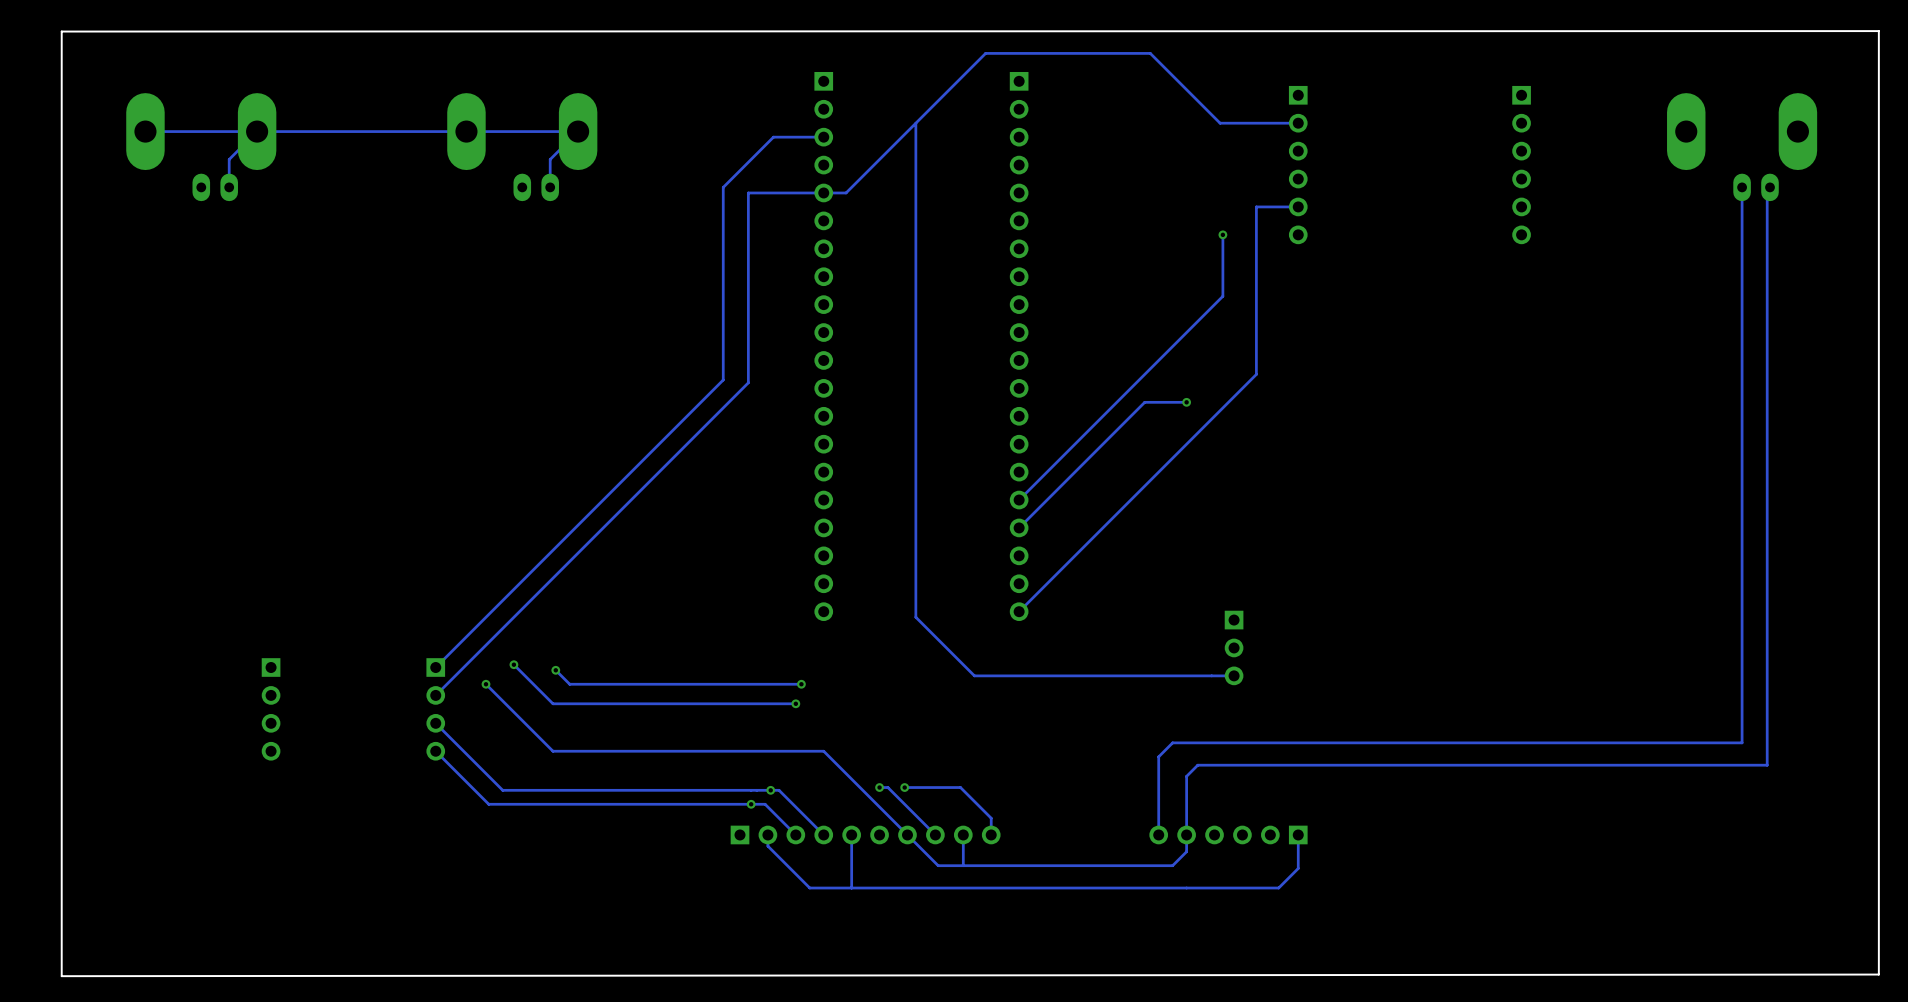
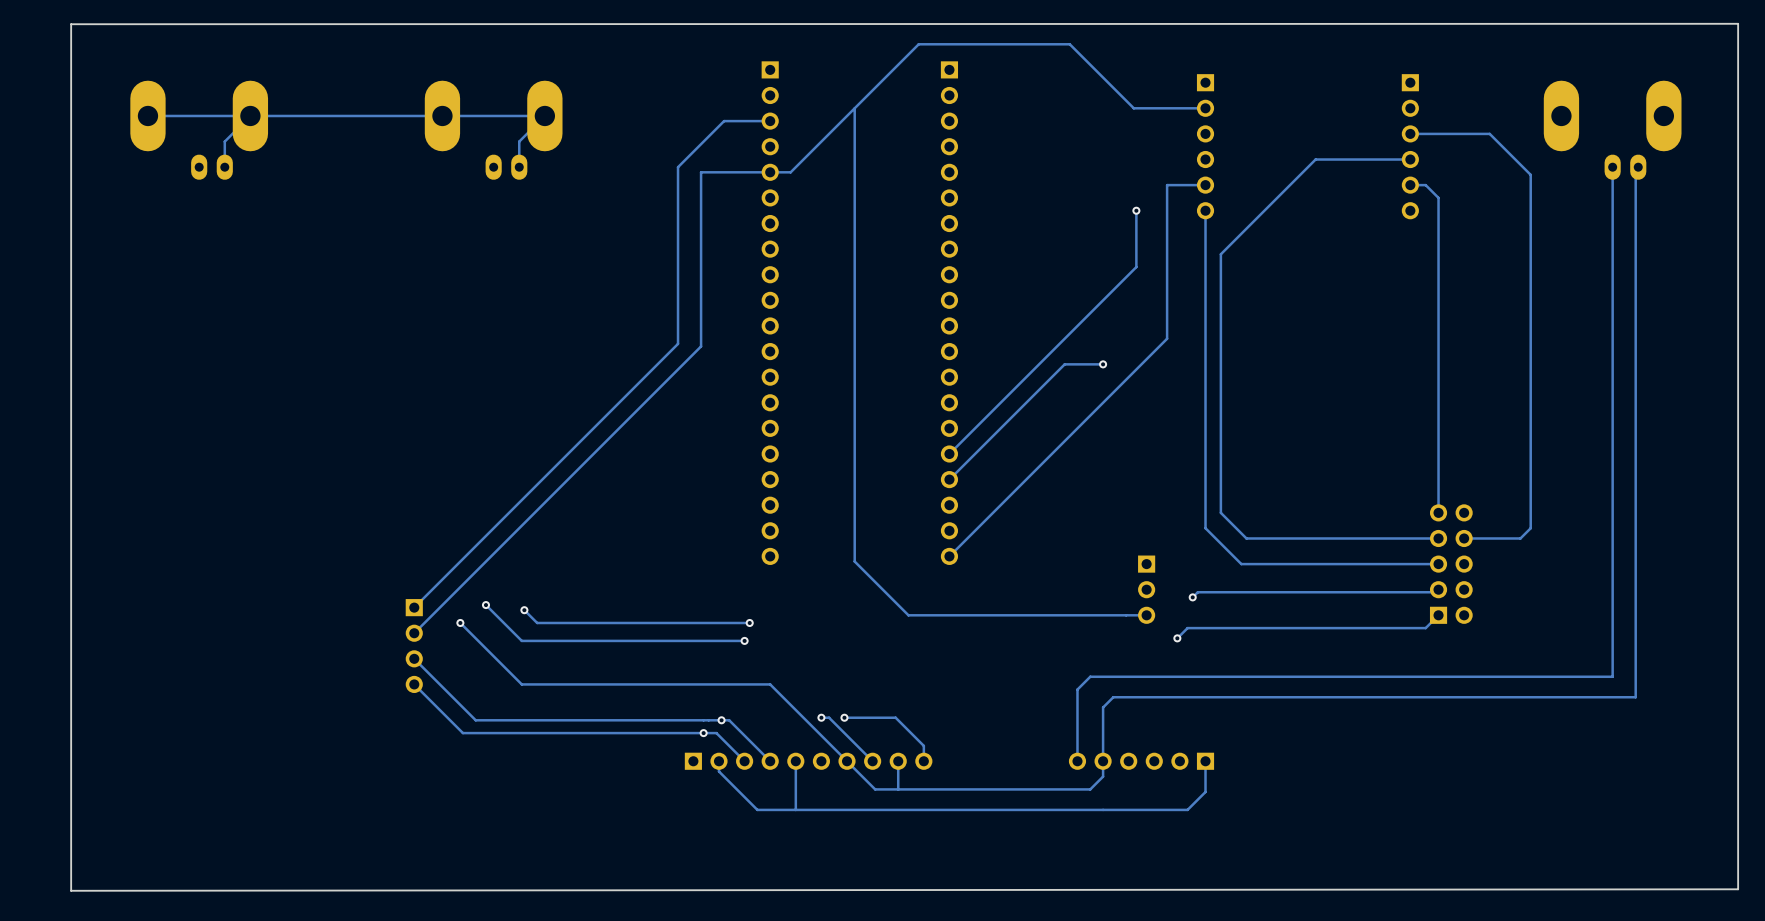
track: none -> (1410, 133) (1489, 133) (1530, 174) (1530, 528) (1520, 538) (1464, 538)
track: none -> (1410, 159) (1315, 159) (1220, 254) (1220, 512) (1246, 538) (1438, 538)
track: none -> (1410, 185) (1425, 185) (1438, 197) (1438, 512)
track: none -> (1205, 210) (1205, 528) (1241, 564) (1438, 564)
part: none -> (1451, 564)
track: none -> (1438, 589) (1435, 592) (1197, 592) (1192, 597)
via: none -> (1192, 597)
track: none -> (1438, 615) (1425, 628) (1187, 628) (1177, 638)
via: none -> (1177, 638)
part: (271, 709) -> none

